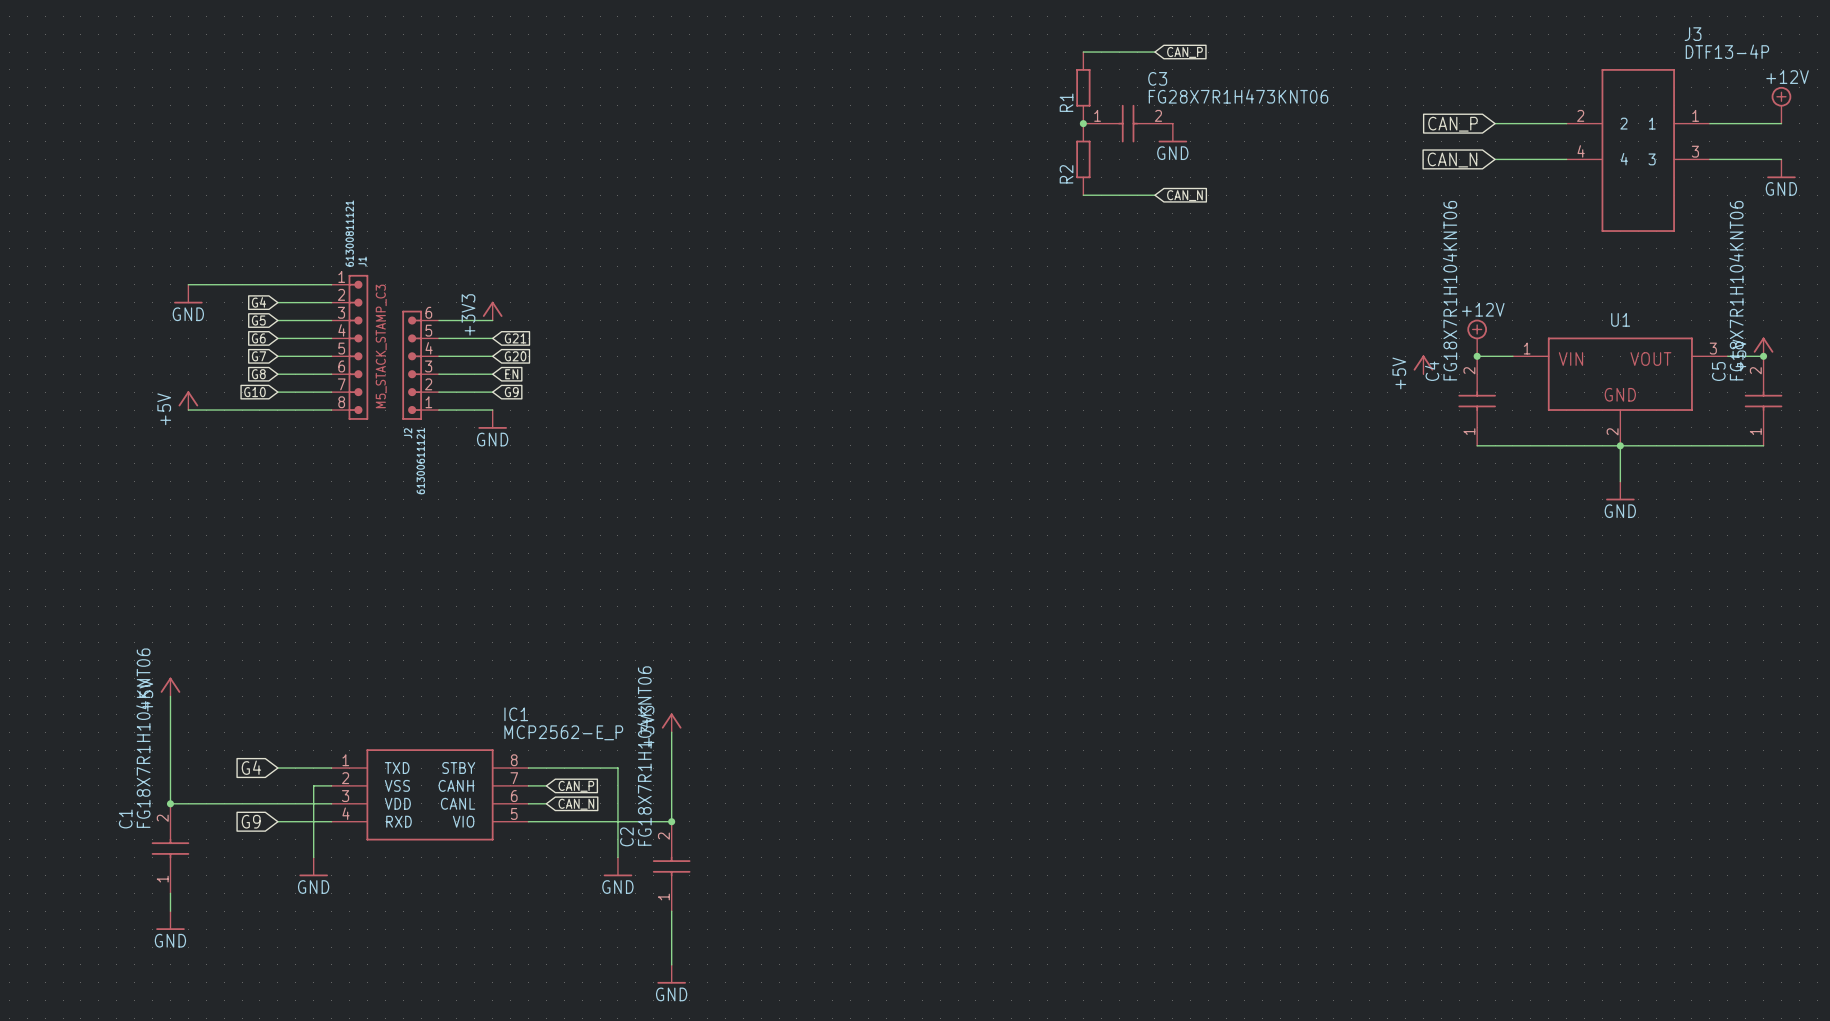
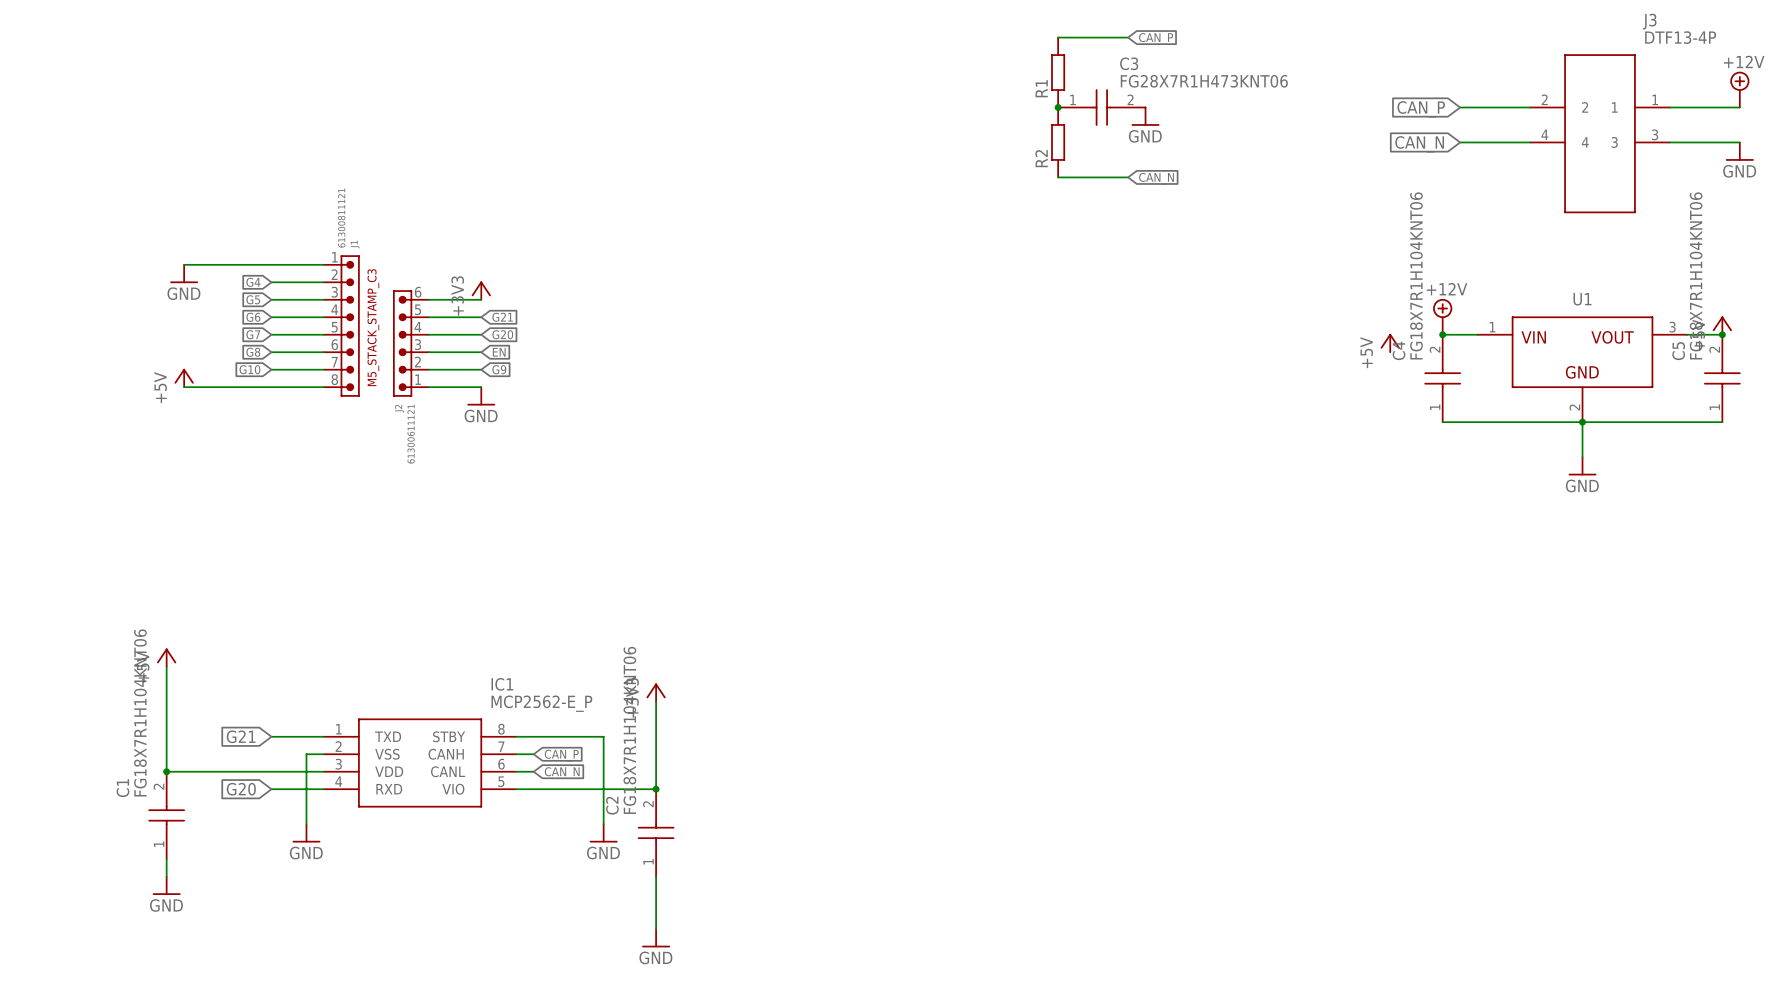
global label: G4 (251, 767) -> G21 (241, 736)
global label: G9 (251, 821) -> G20 (241, 789)

